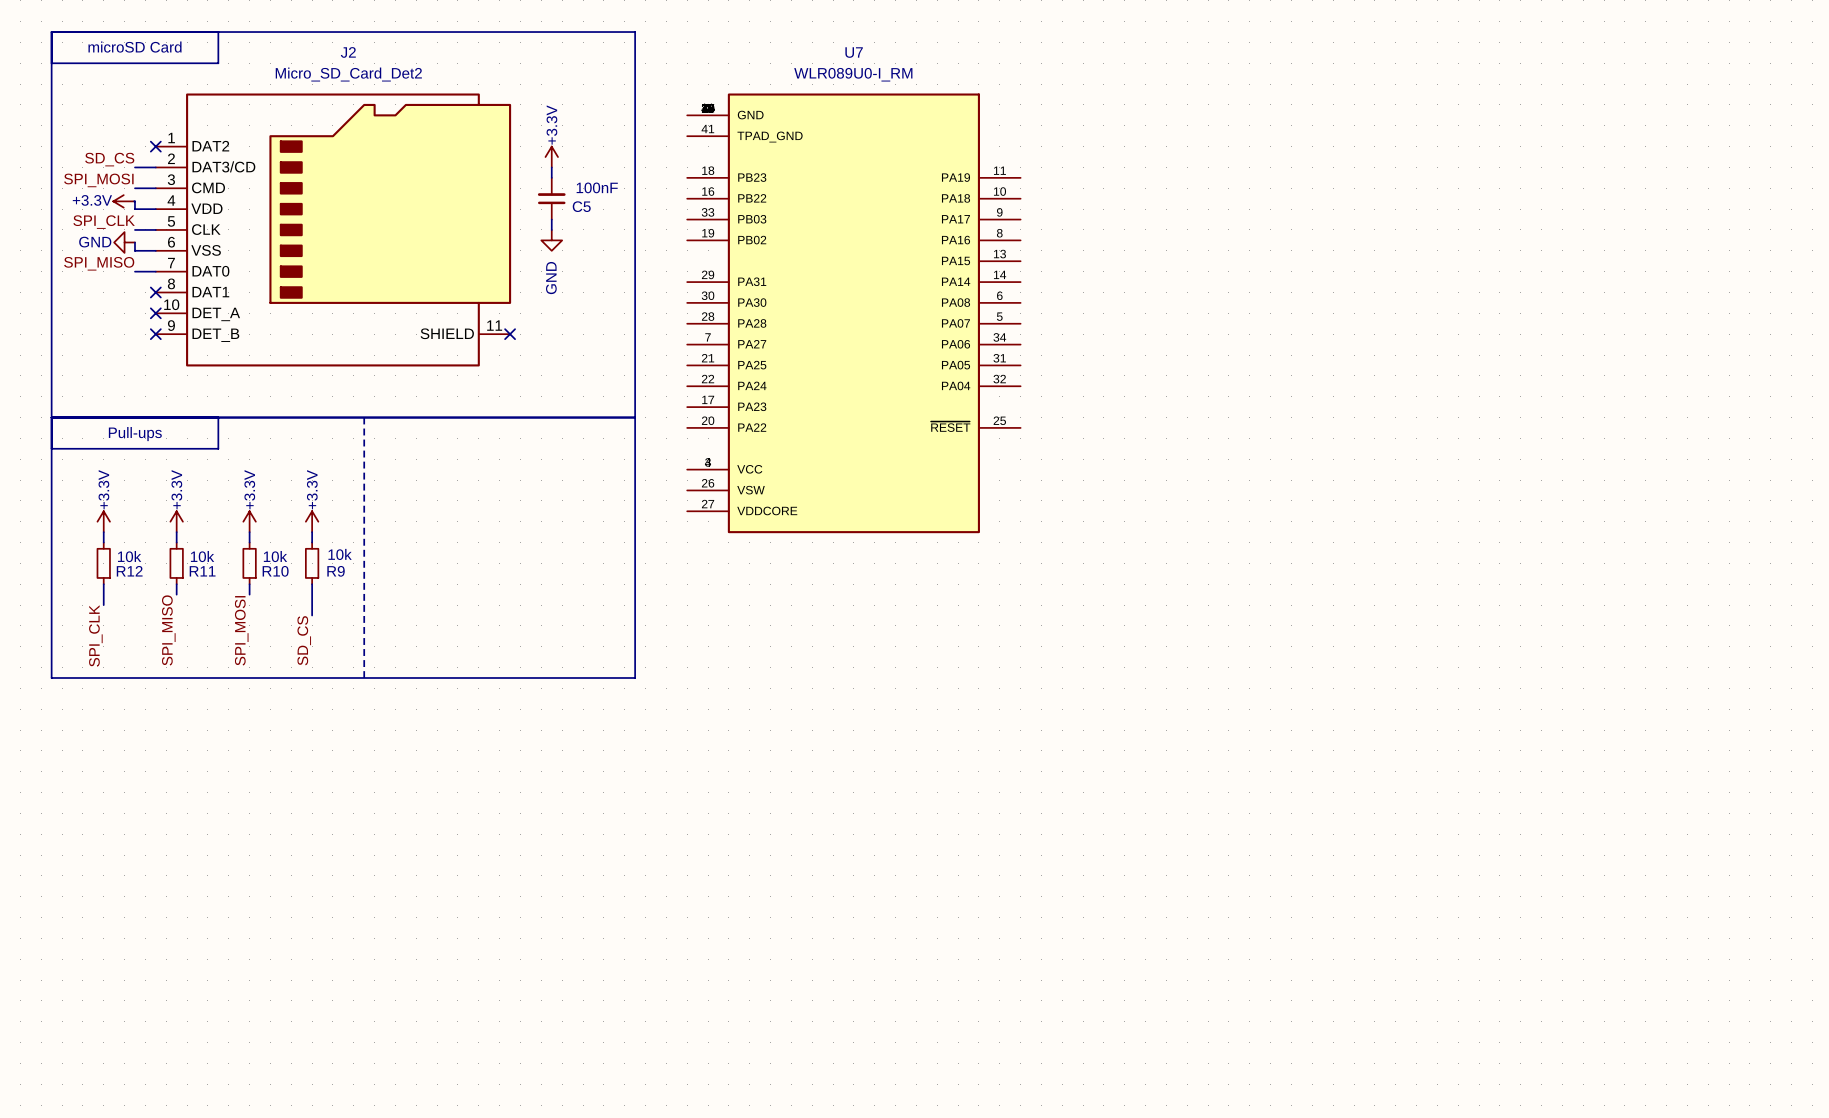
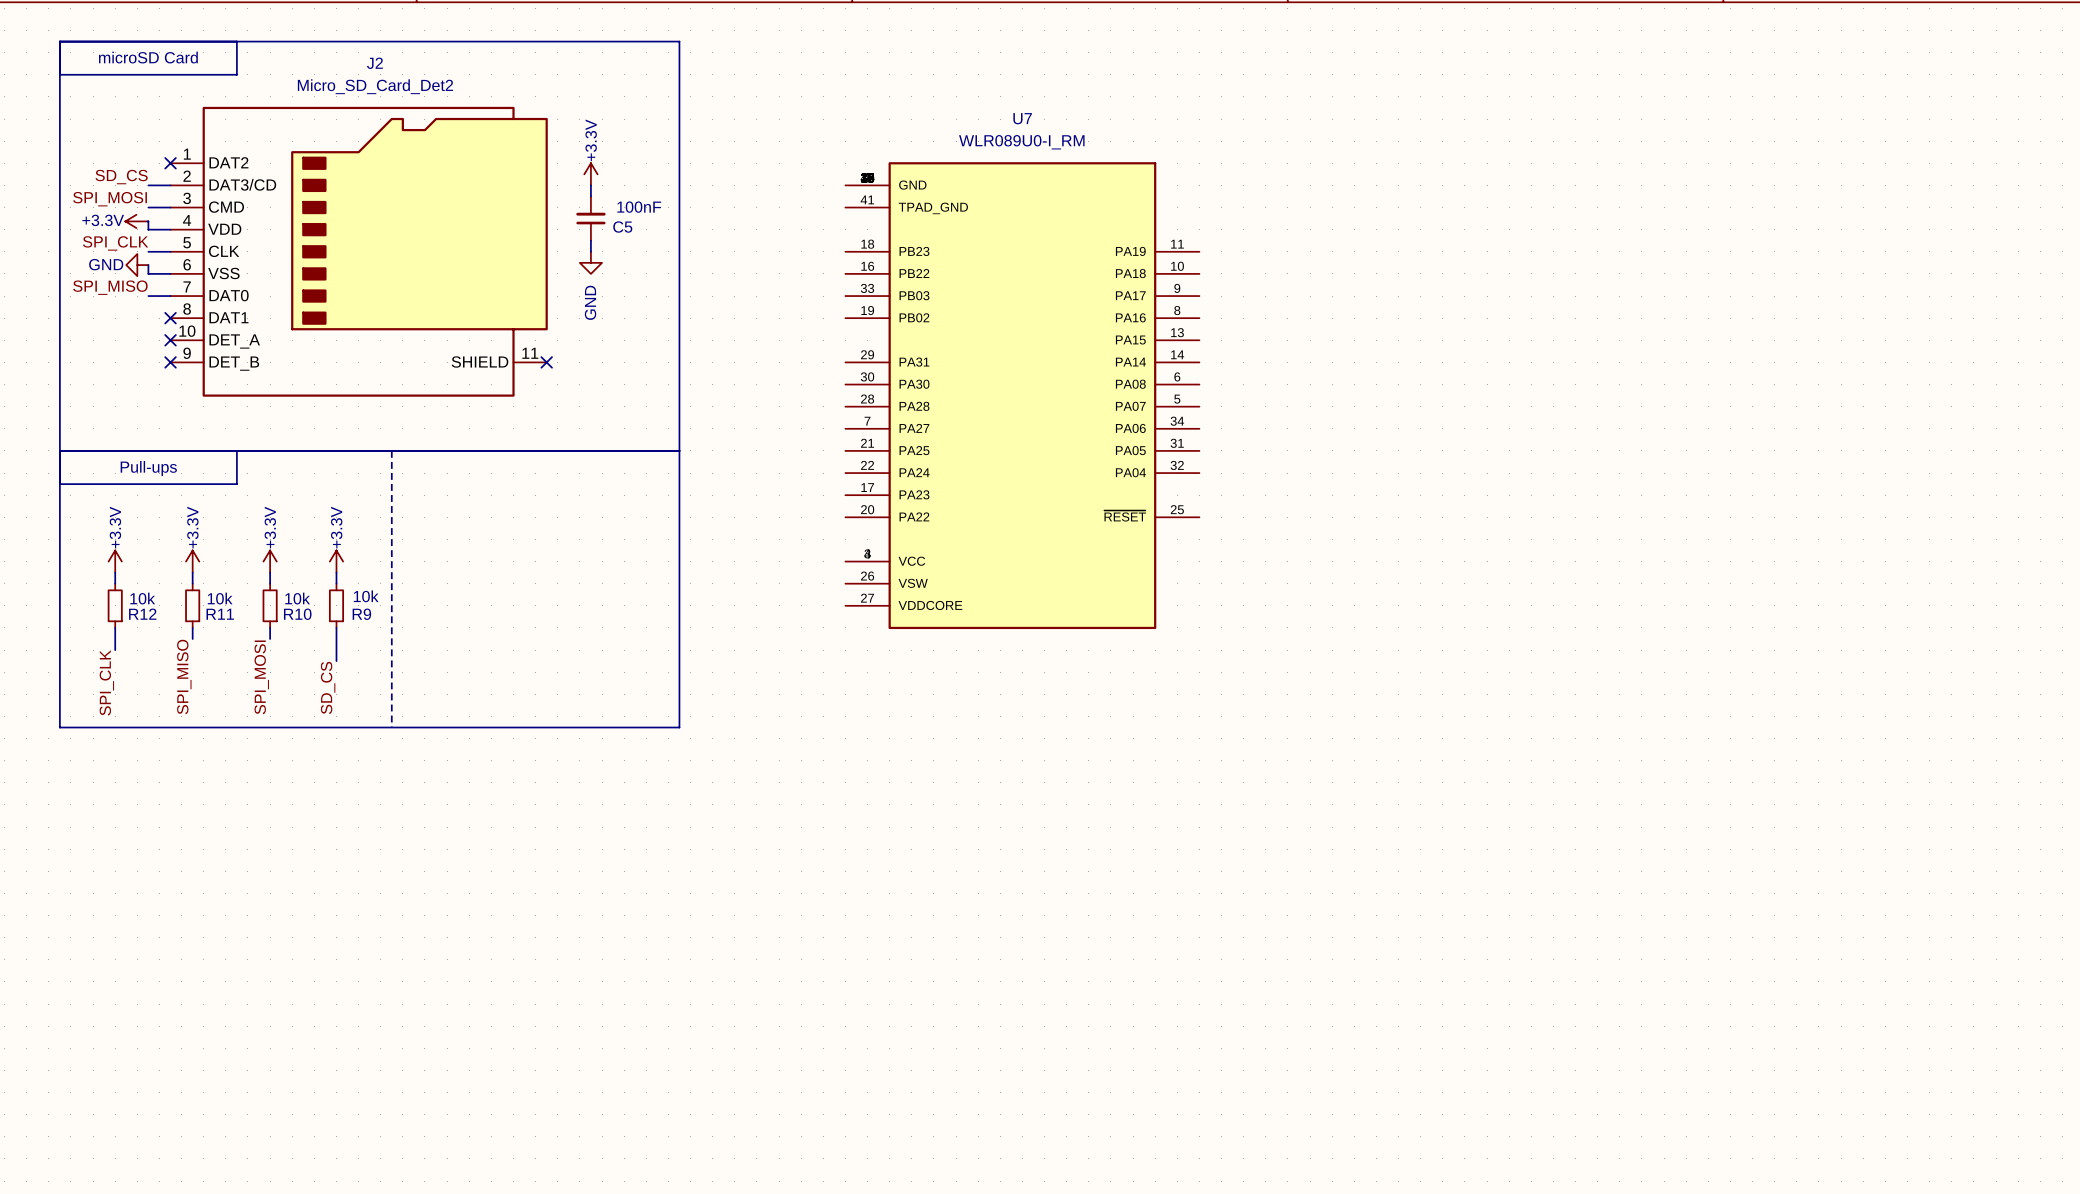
U7 position: (853, 313) -> (1022, 395)

